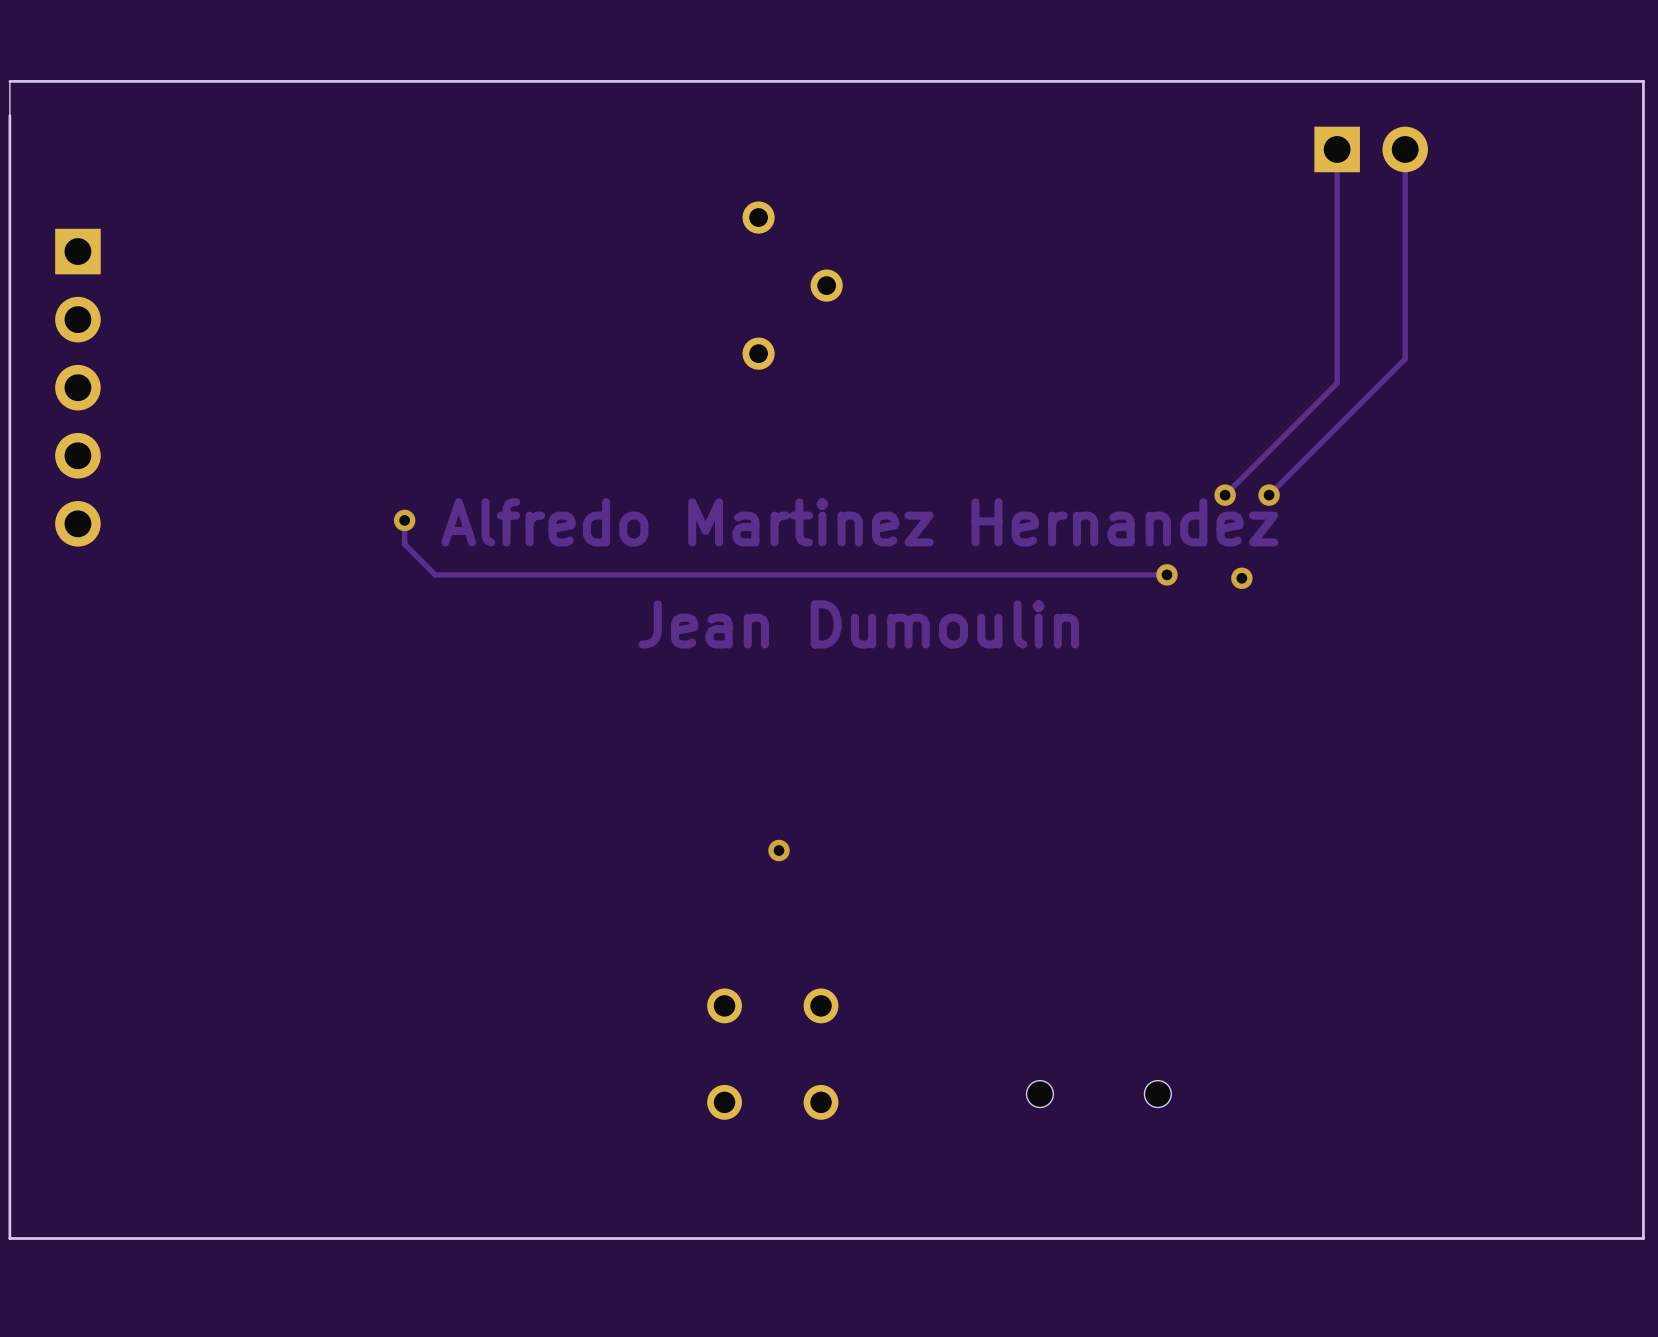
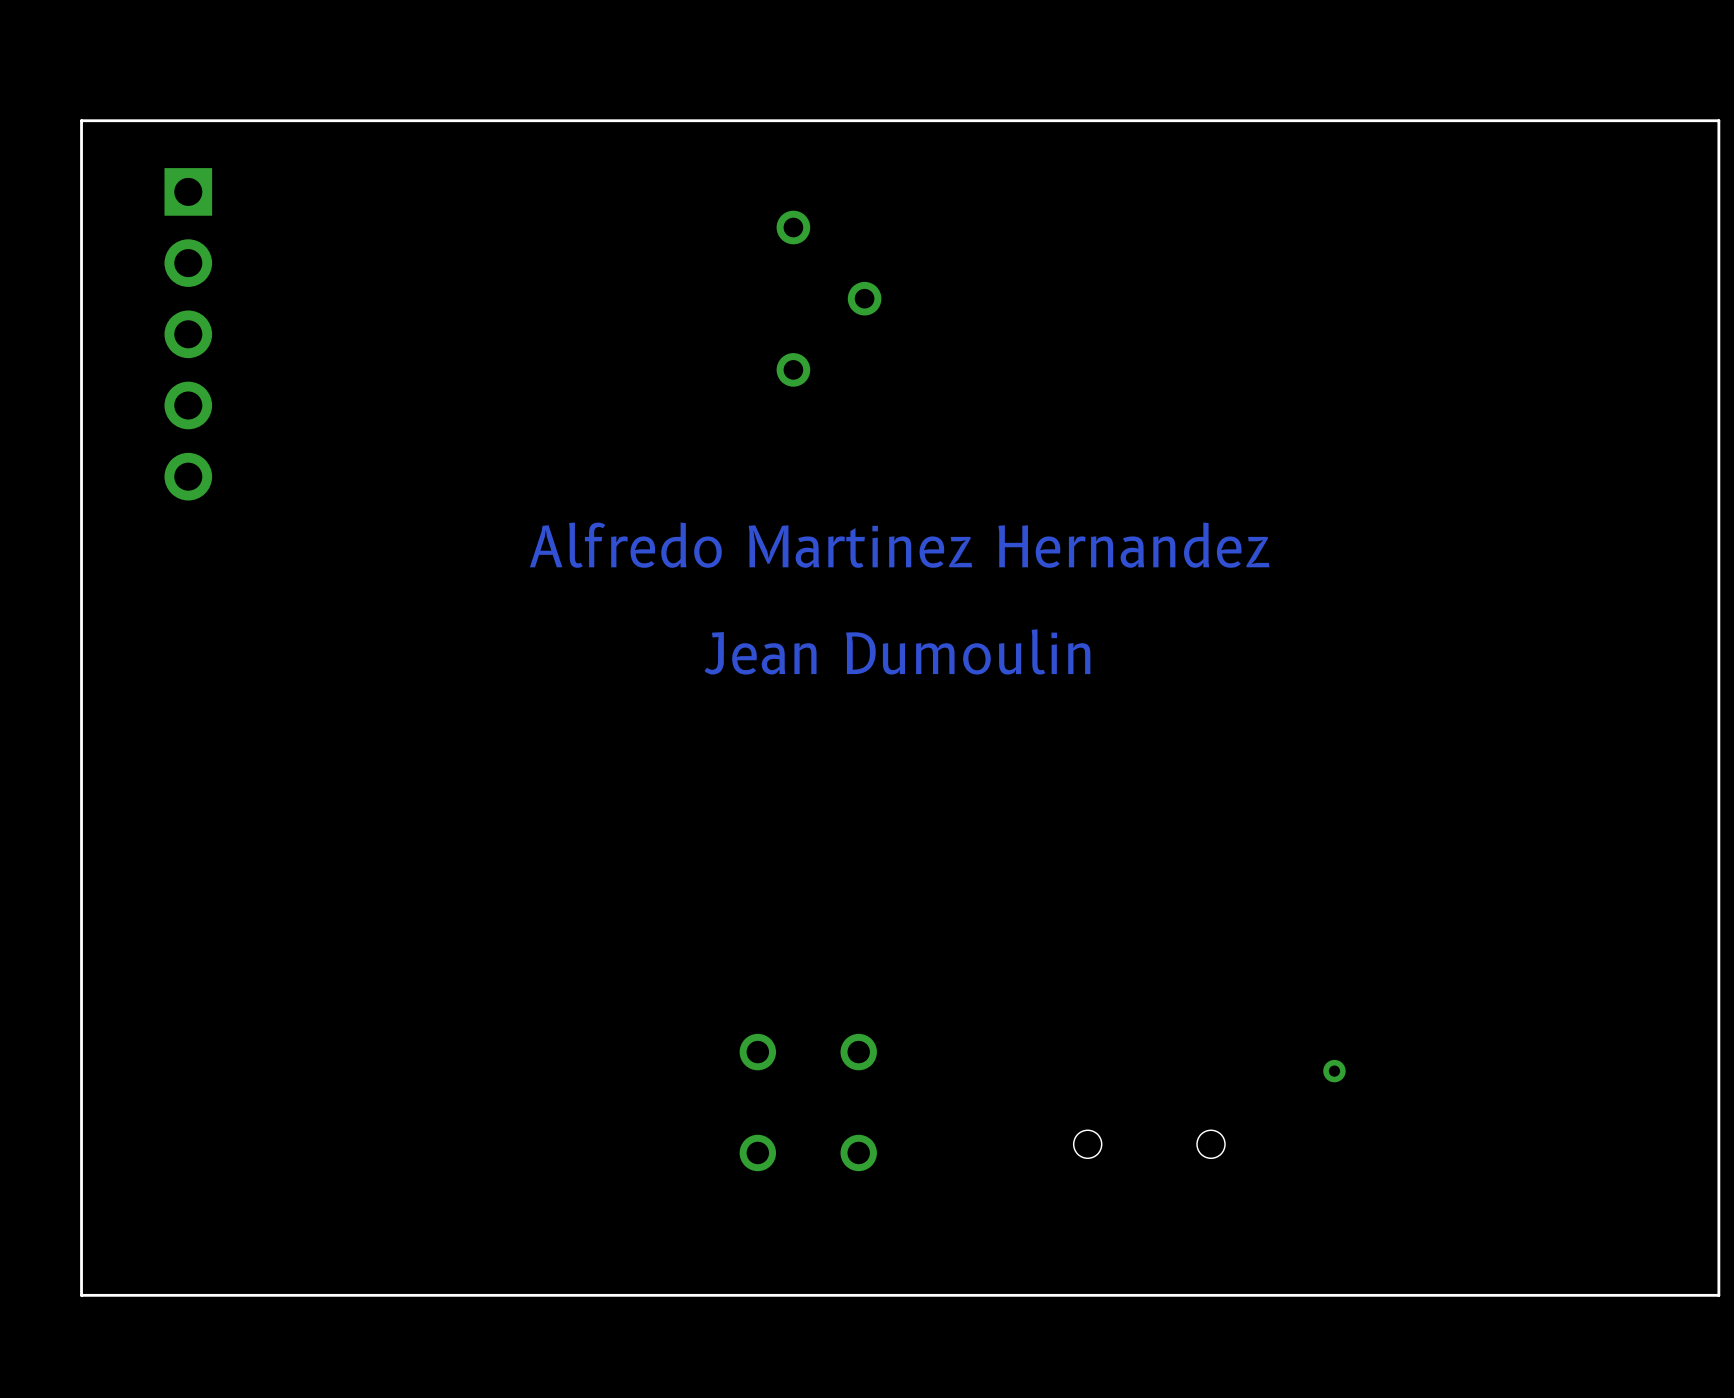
board edge: (1643, 115) (1643, 81) (9, 81) (9, 1238) (77, 1238) -> (1718, 120) (81, 120) (81, 1295)
track: (1337, 149) (1337, 383) (1225, 495) -> none
part: (1371, 149) -> none
track: (1405, 149) (1405, 358) (1269, 495) -> none
part position: (77, 387) -> (188, 334)
via: (1225, 495) -> none
via: (1269, 495) -> none
track: (404, 520) (404, 544) (435, 574) (1166, 574) -> none
via: (404, 520) -> none
via: (1166, 574) -> none
via: (1241, 578) -> none
via: (779, 850) -> none
via: none -> (1334, 1071)

